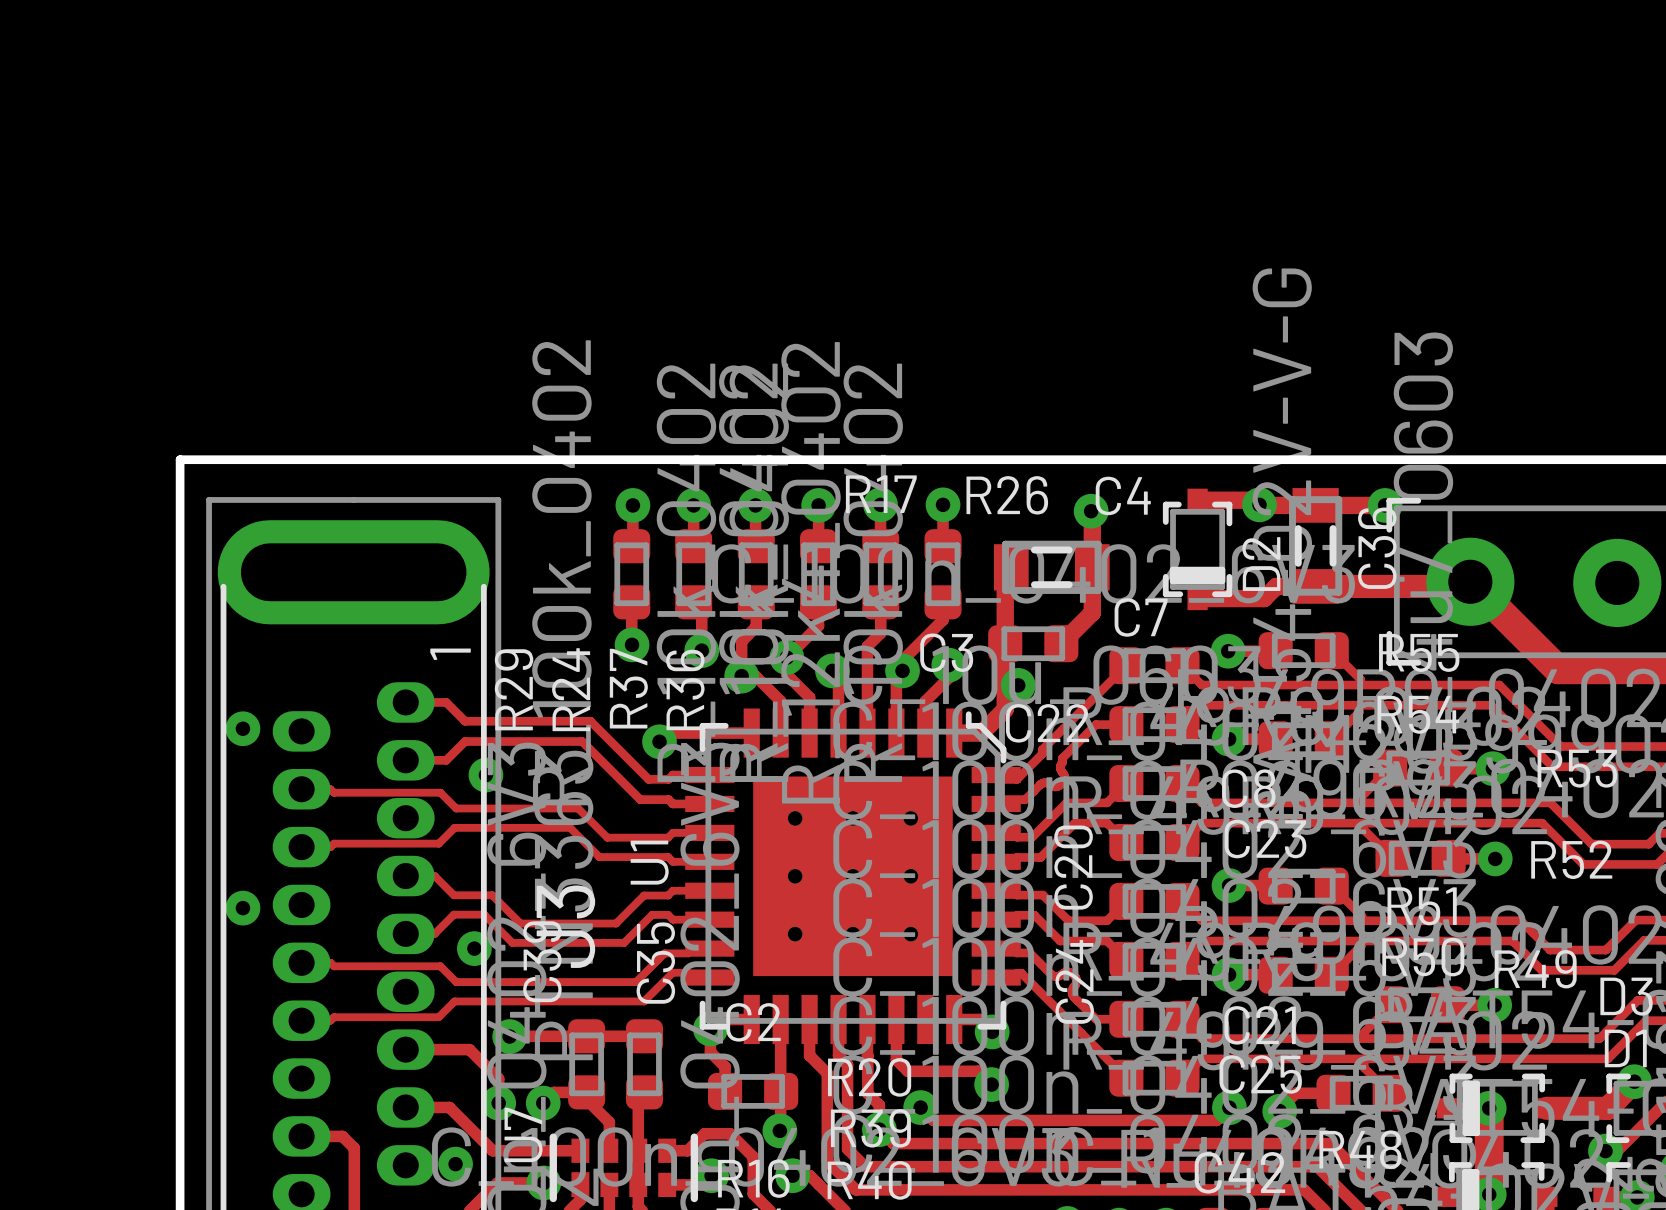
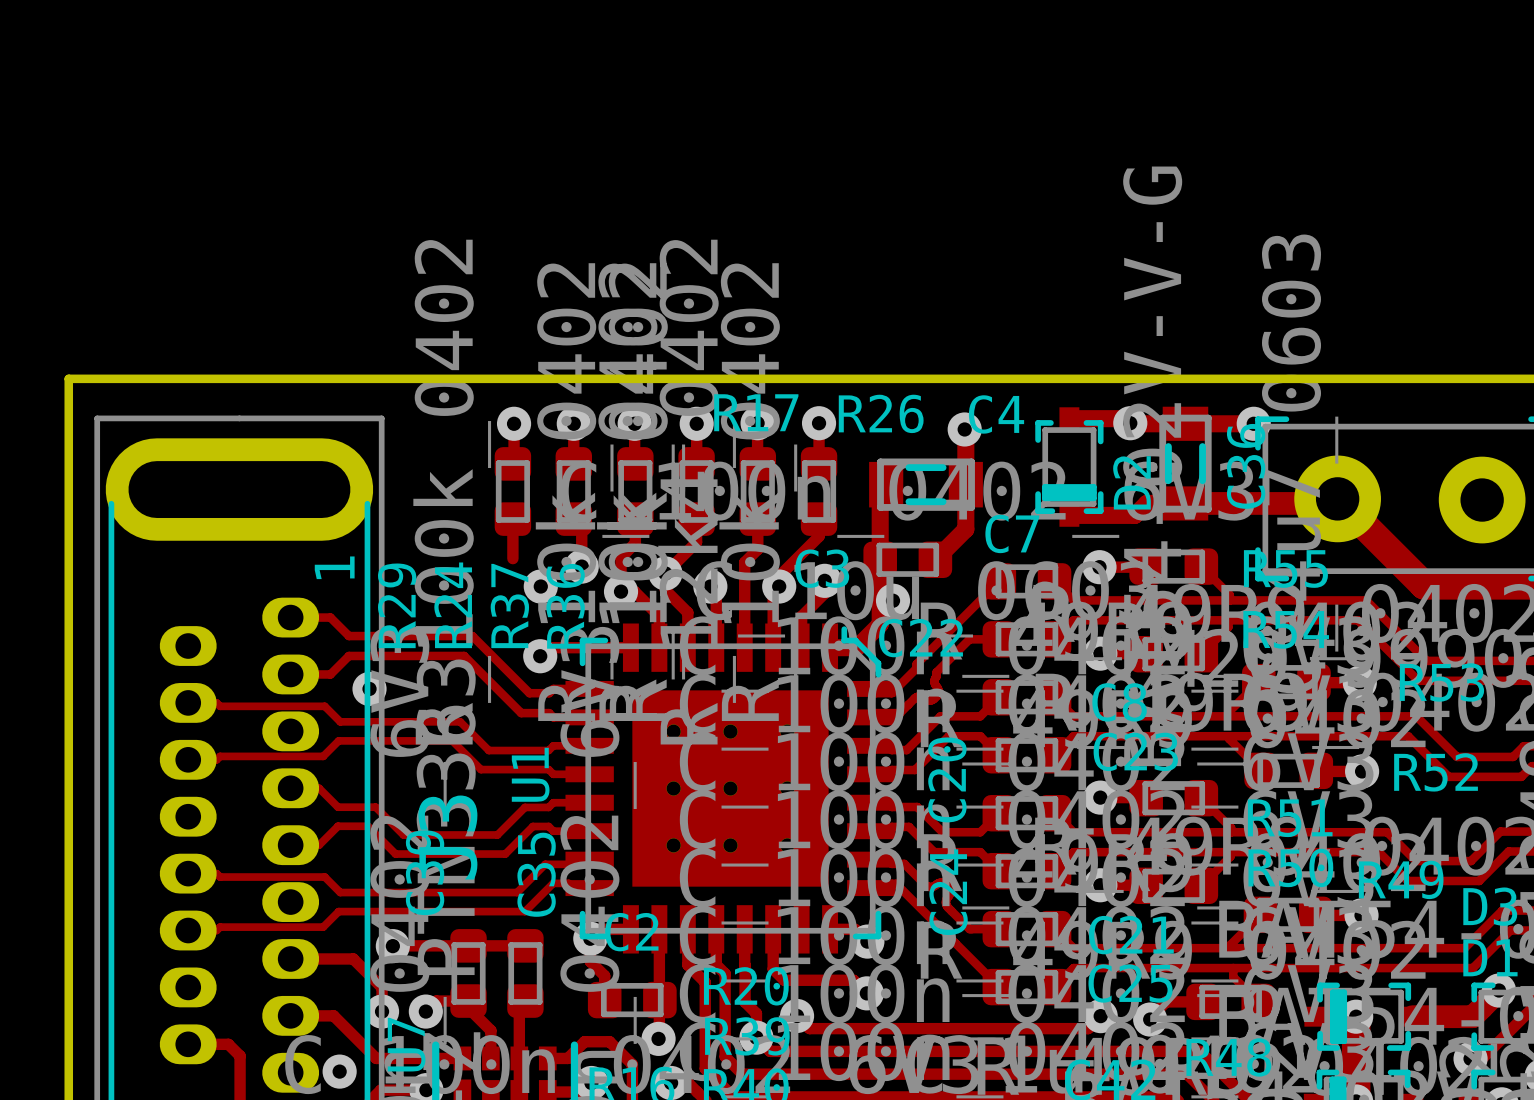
via position: (632, 644) -> (540, 586)
via: (242, 728) -> none
via: (242, 908) -> none
via: (474, 948) -> none

